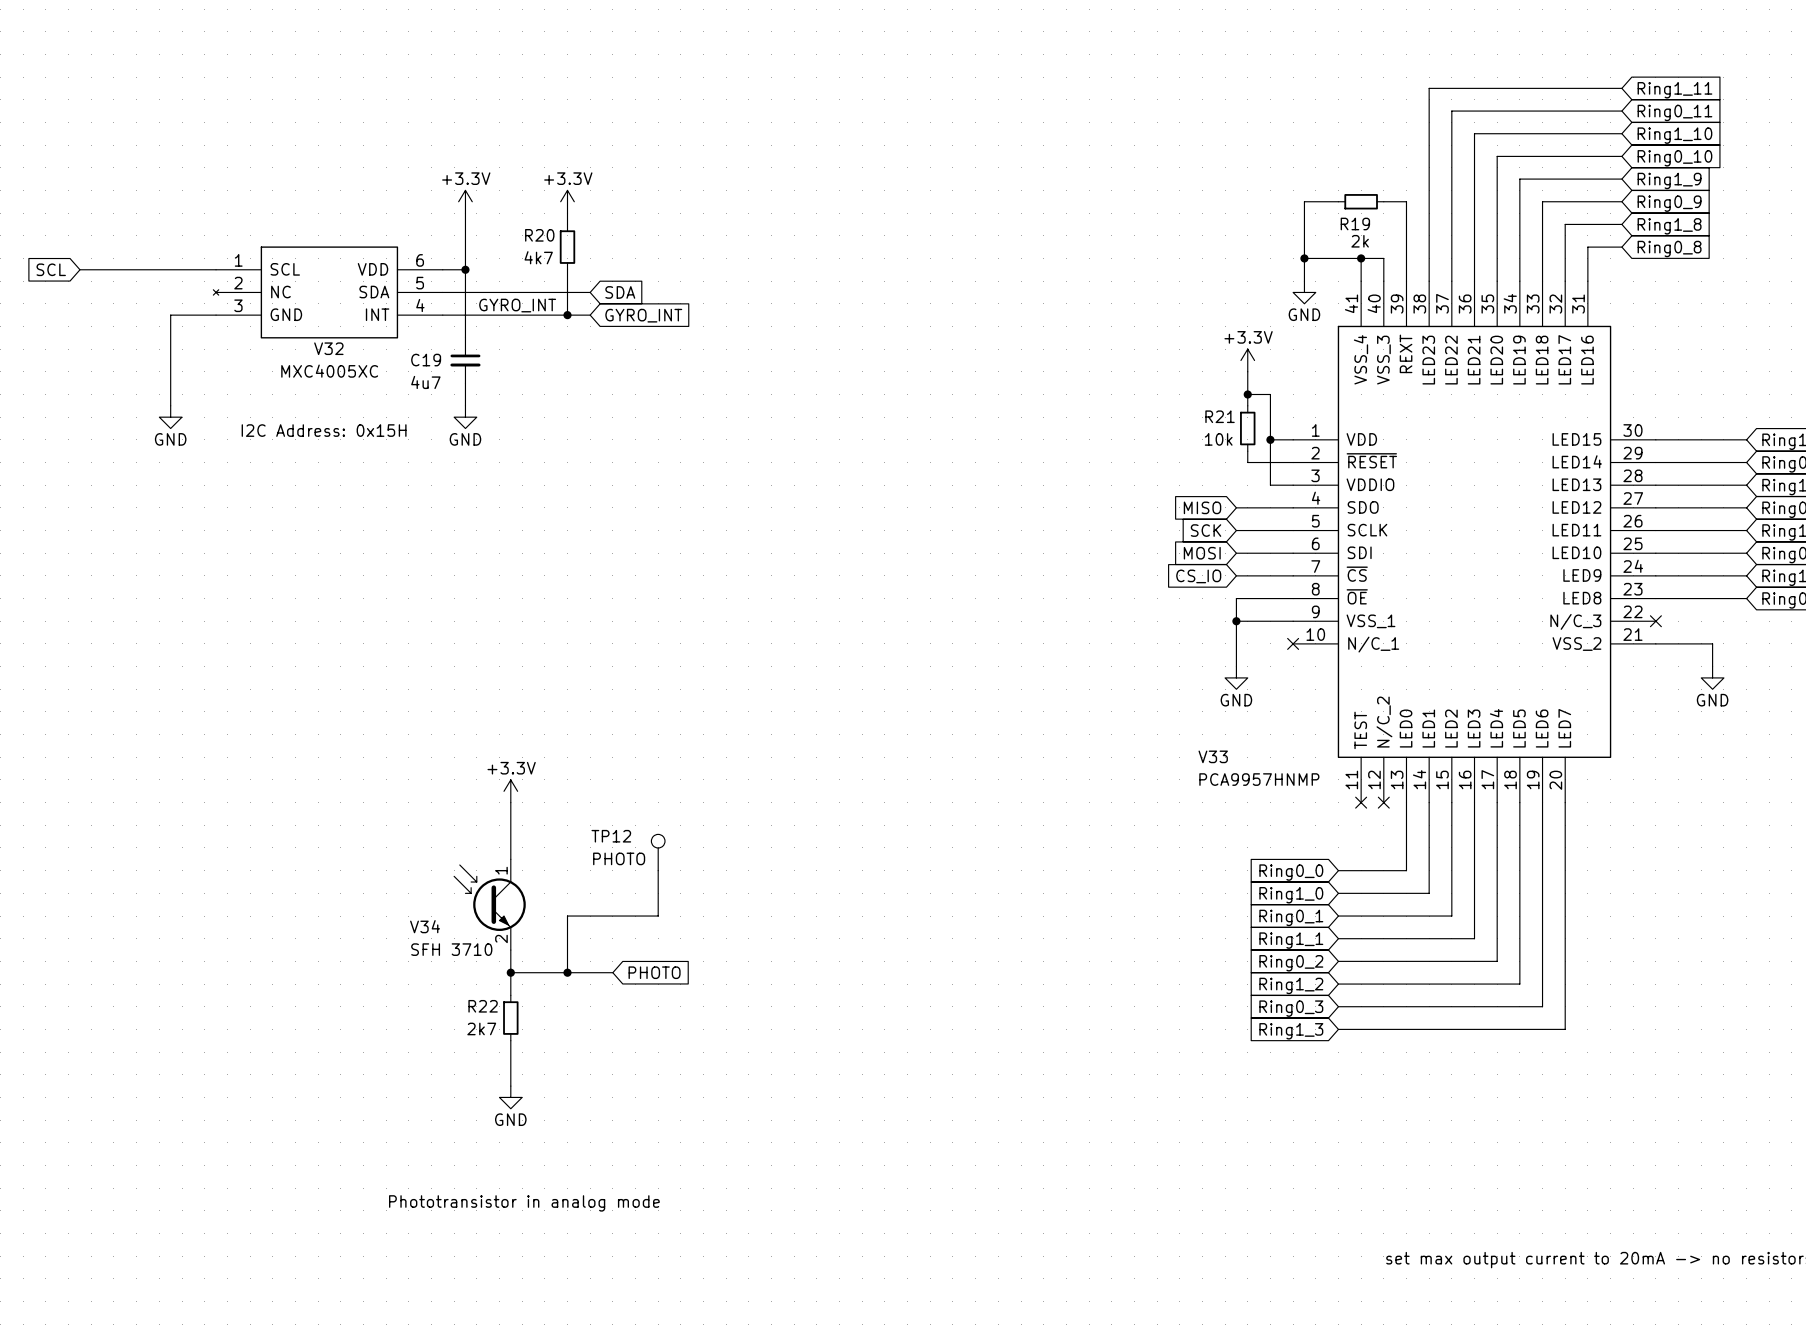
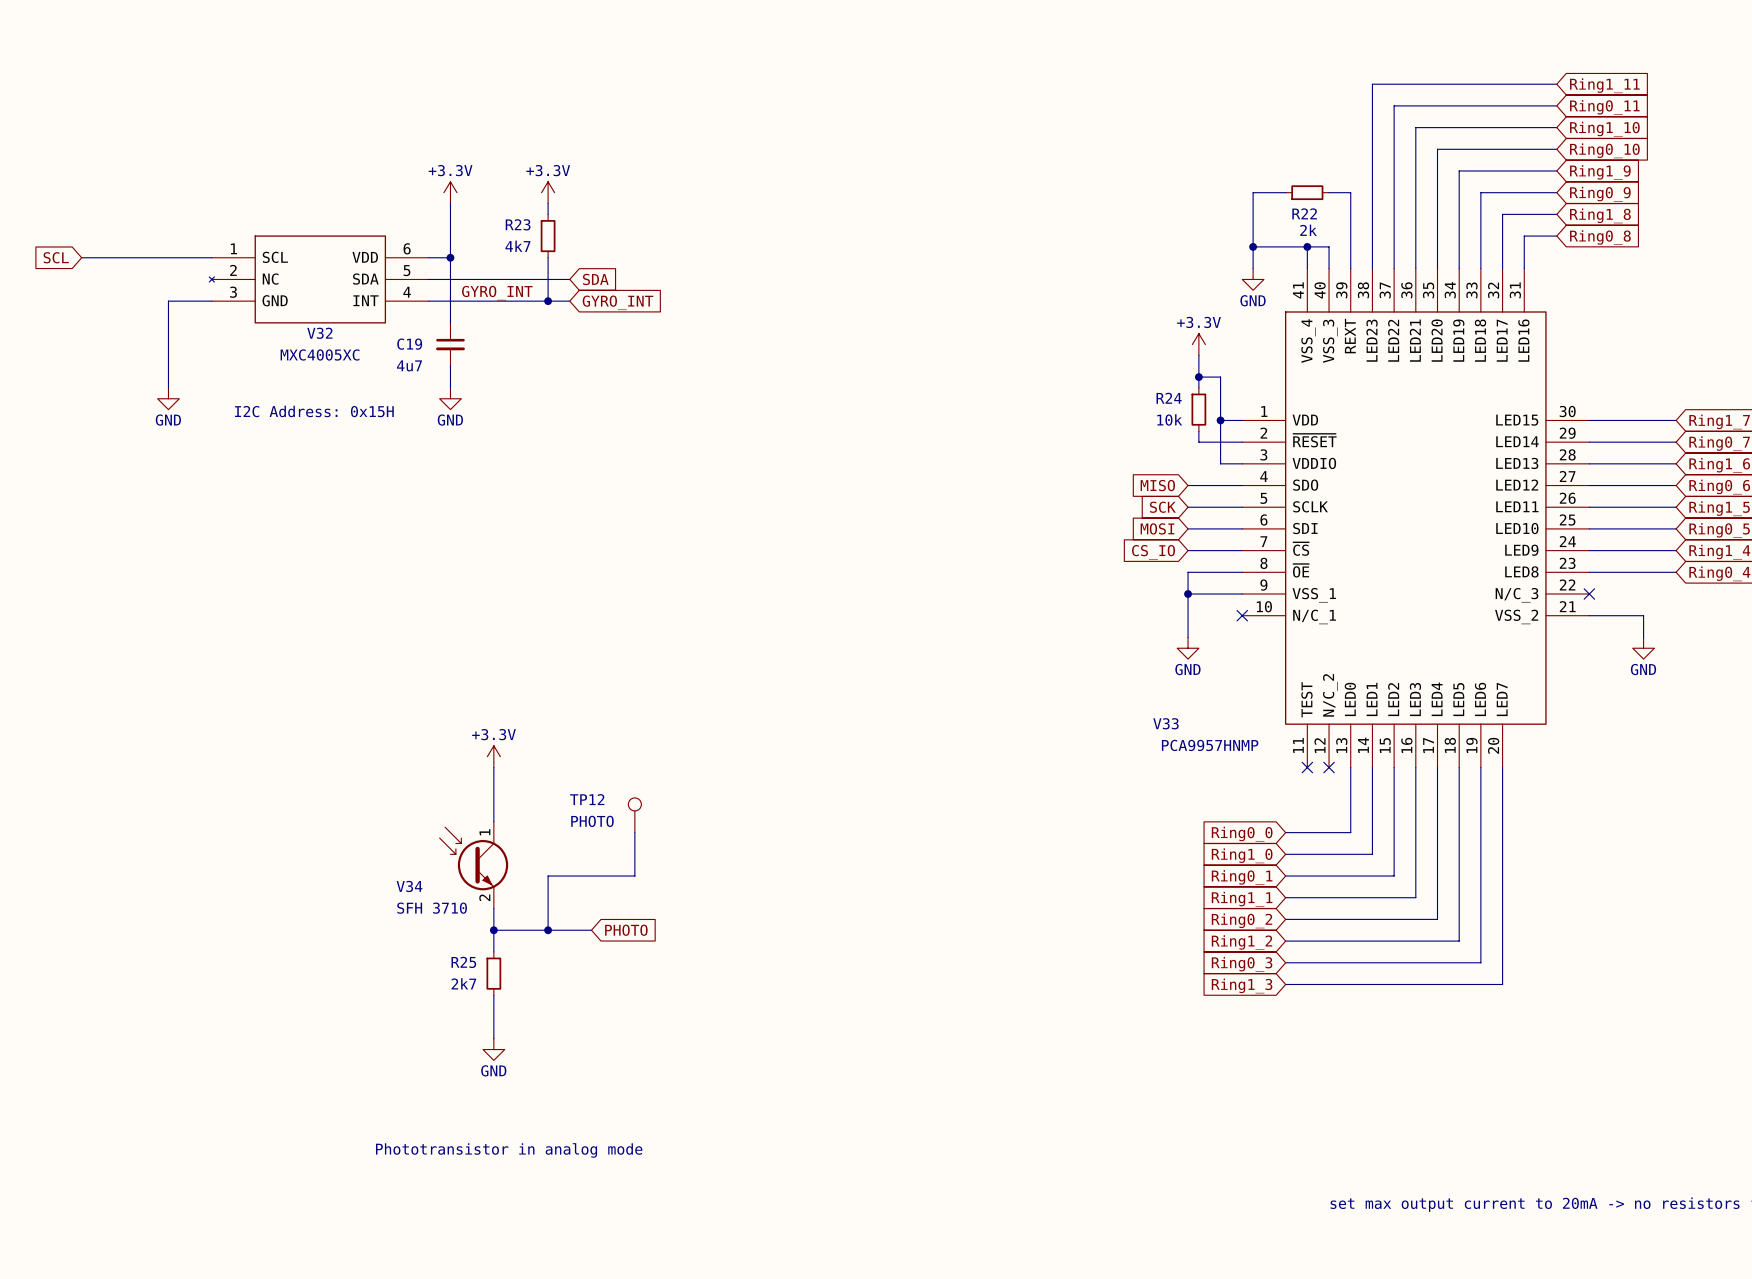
R19 name: R19 (1355, 224) -> R22 (1304, 213)
R20 name: R20 (539, 235) -> R23 (518, 224)
R21 name: R21 (1220, 416) -> R24 (1169, 398)
R22 name: R22 (483, 1006) -> R25 (463, 962)

